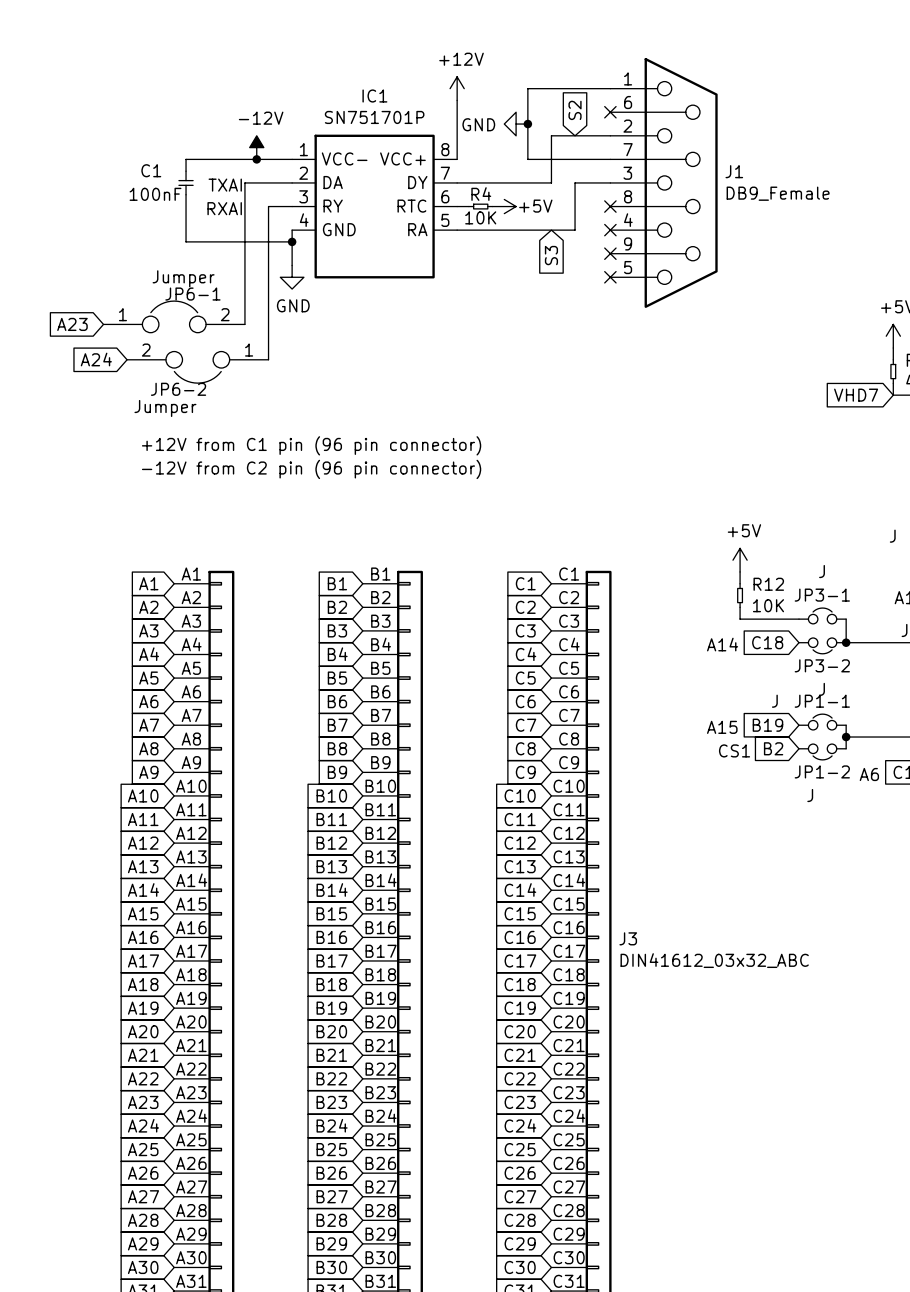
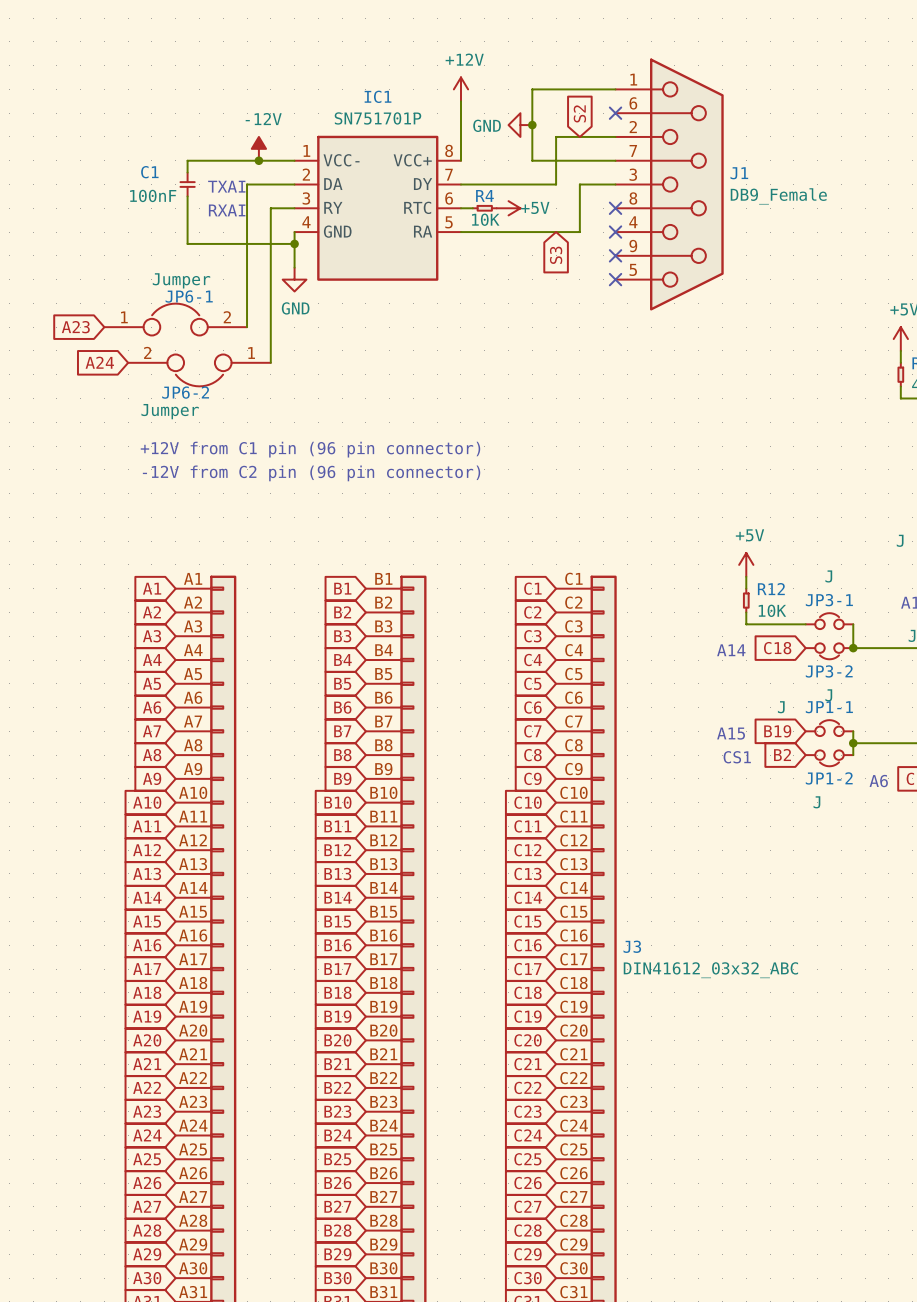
global label: VHD7 (856, 395) -> none

